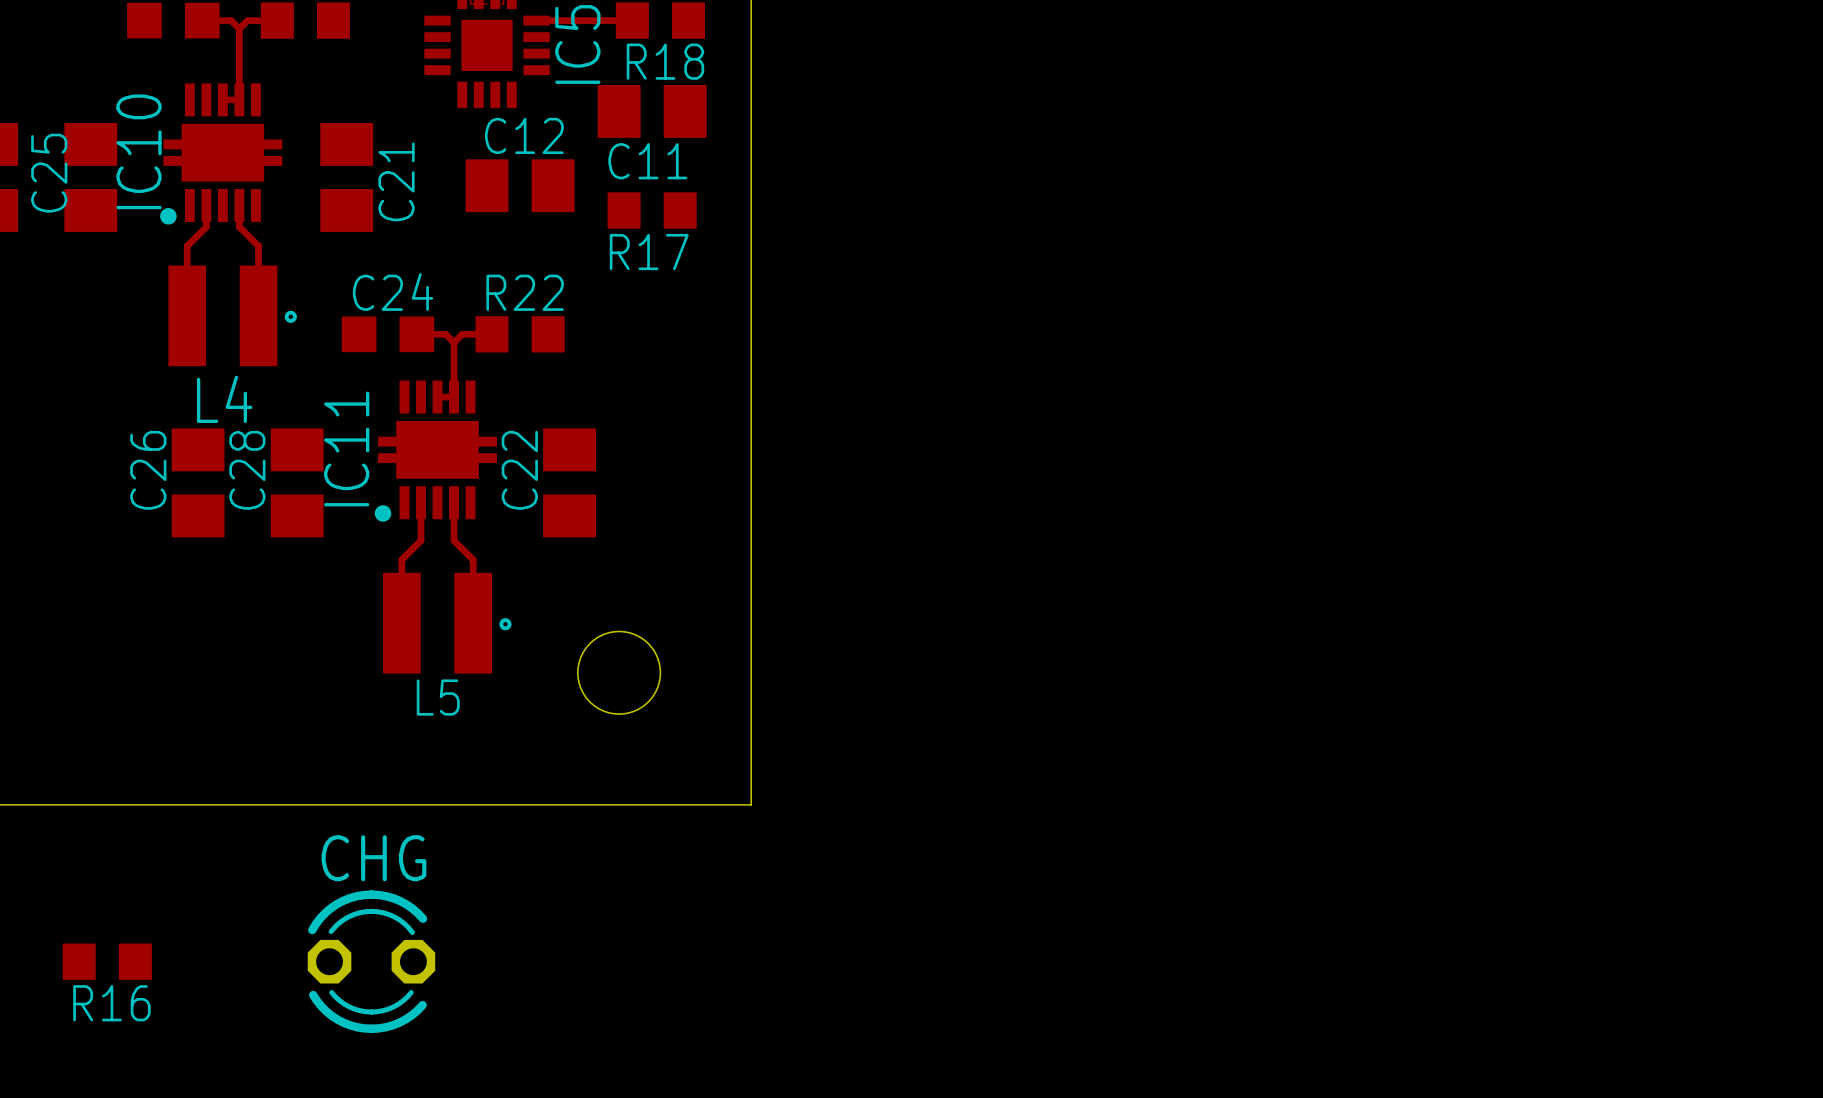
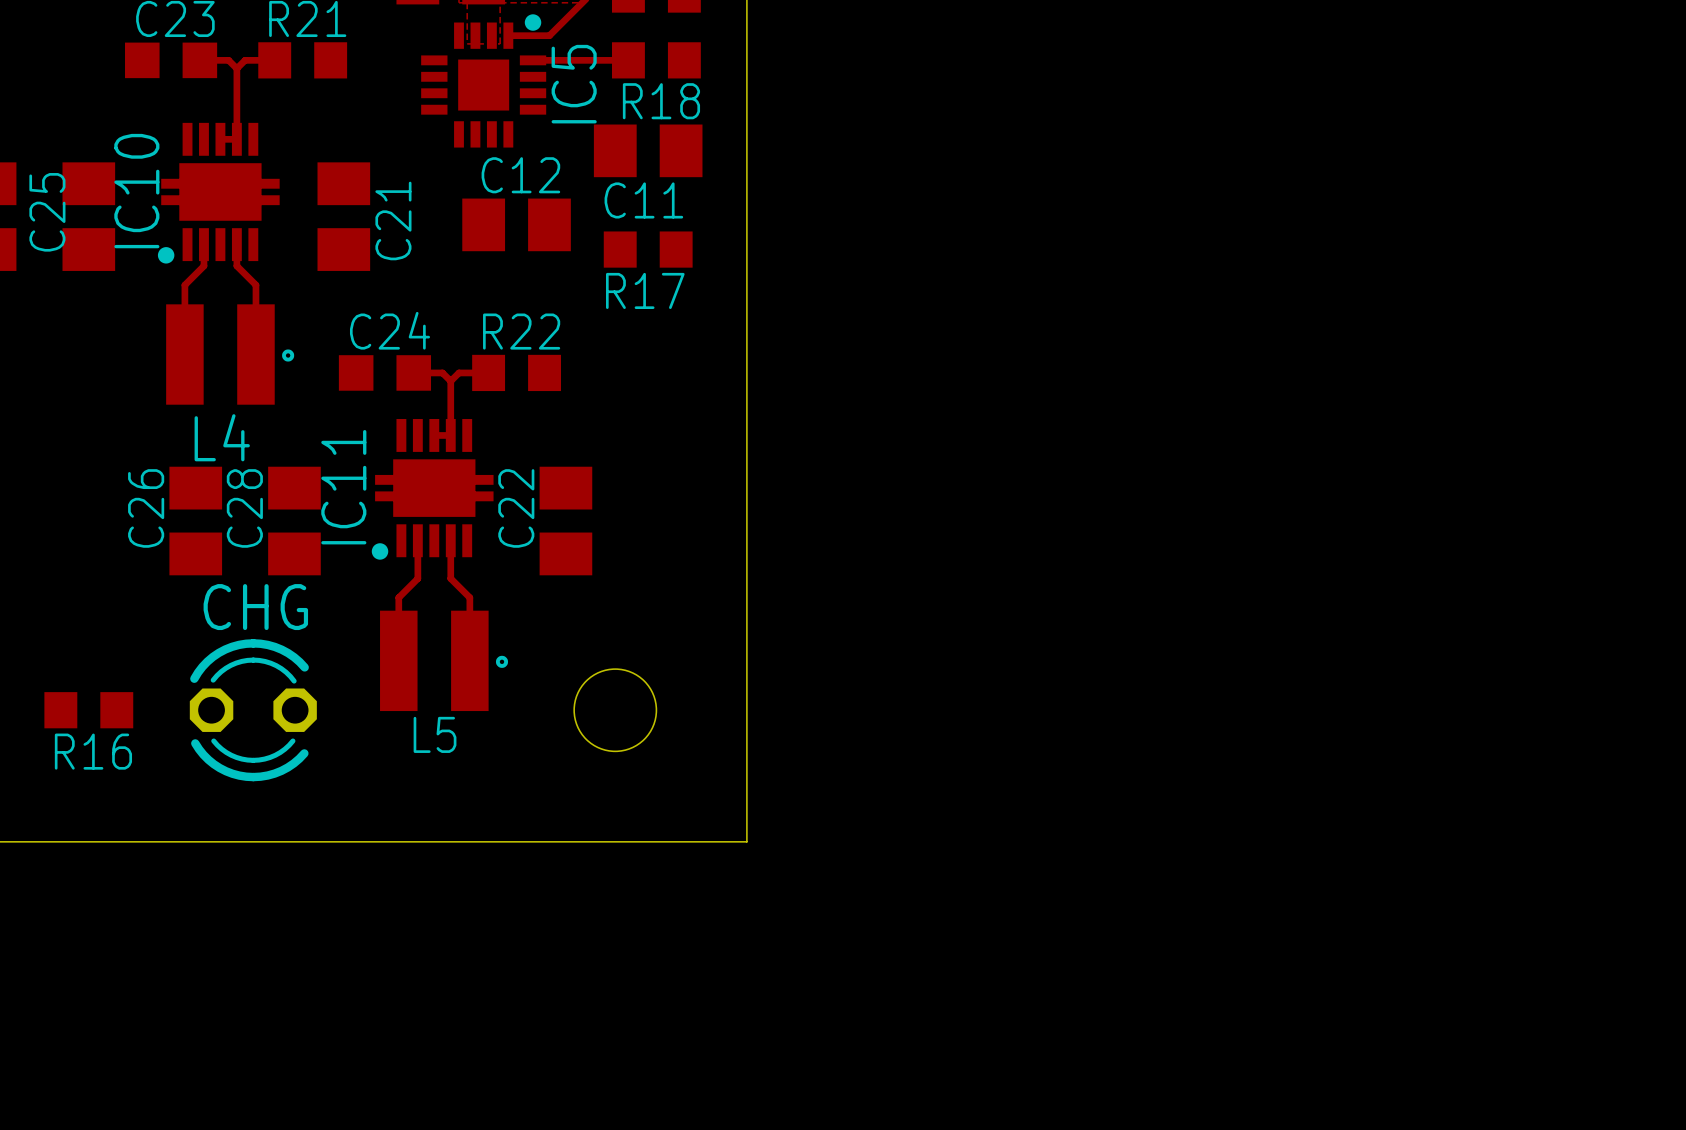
R16 position: (107, 961) -> (88, 710)
CHG position: (371, 961) -> (253, 710)

